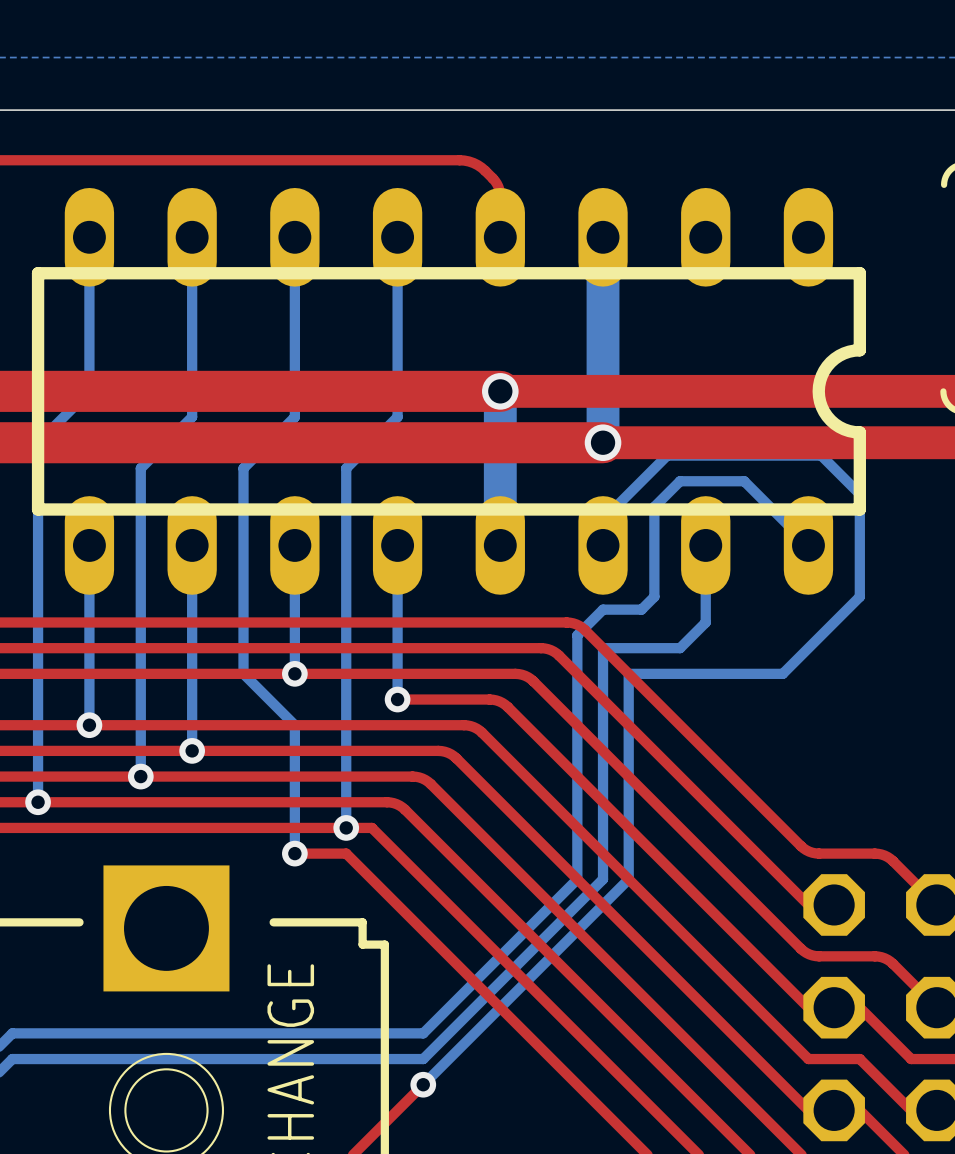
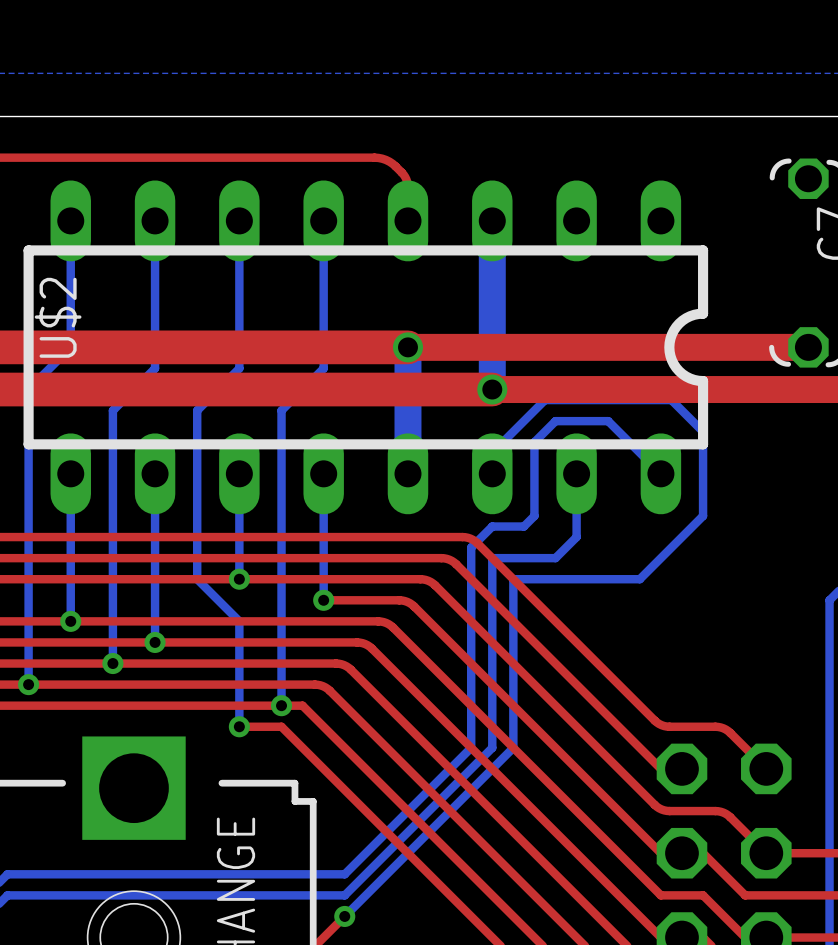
U$2 name: none -> U$2 (58, 317)

